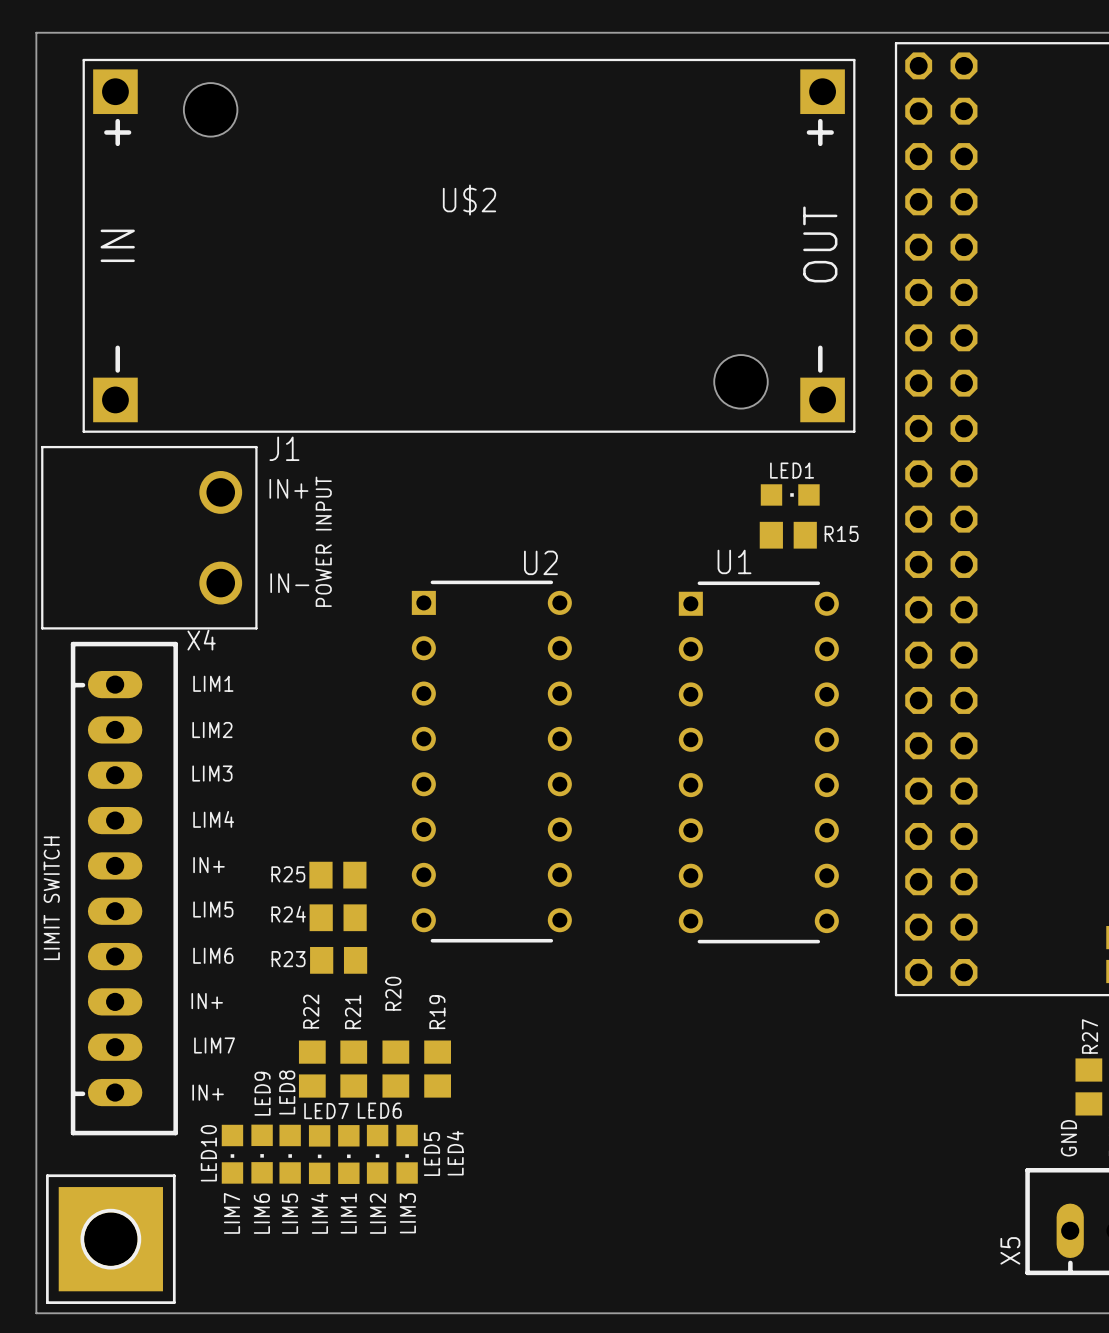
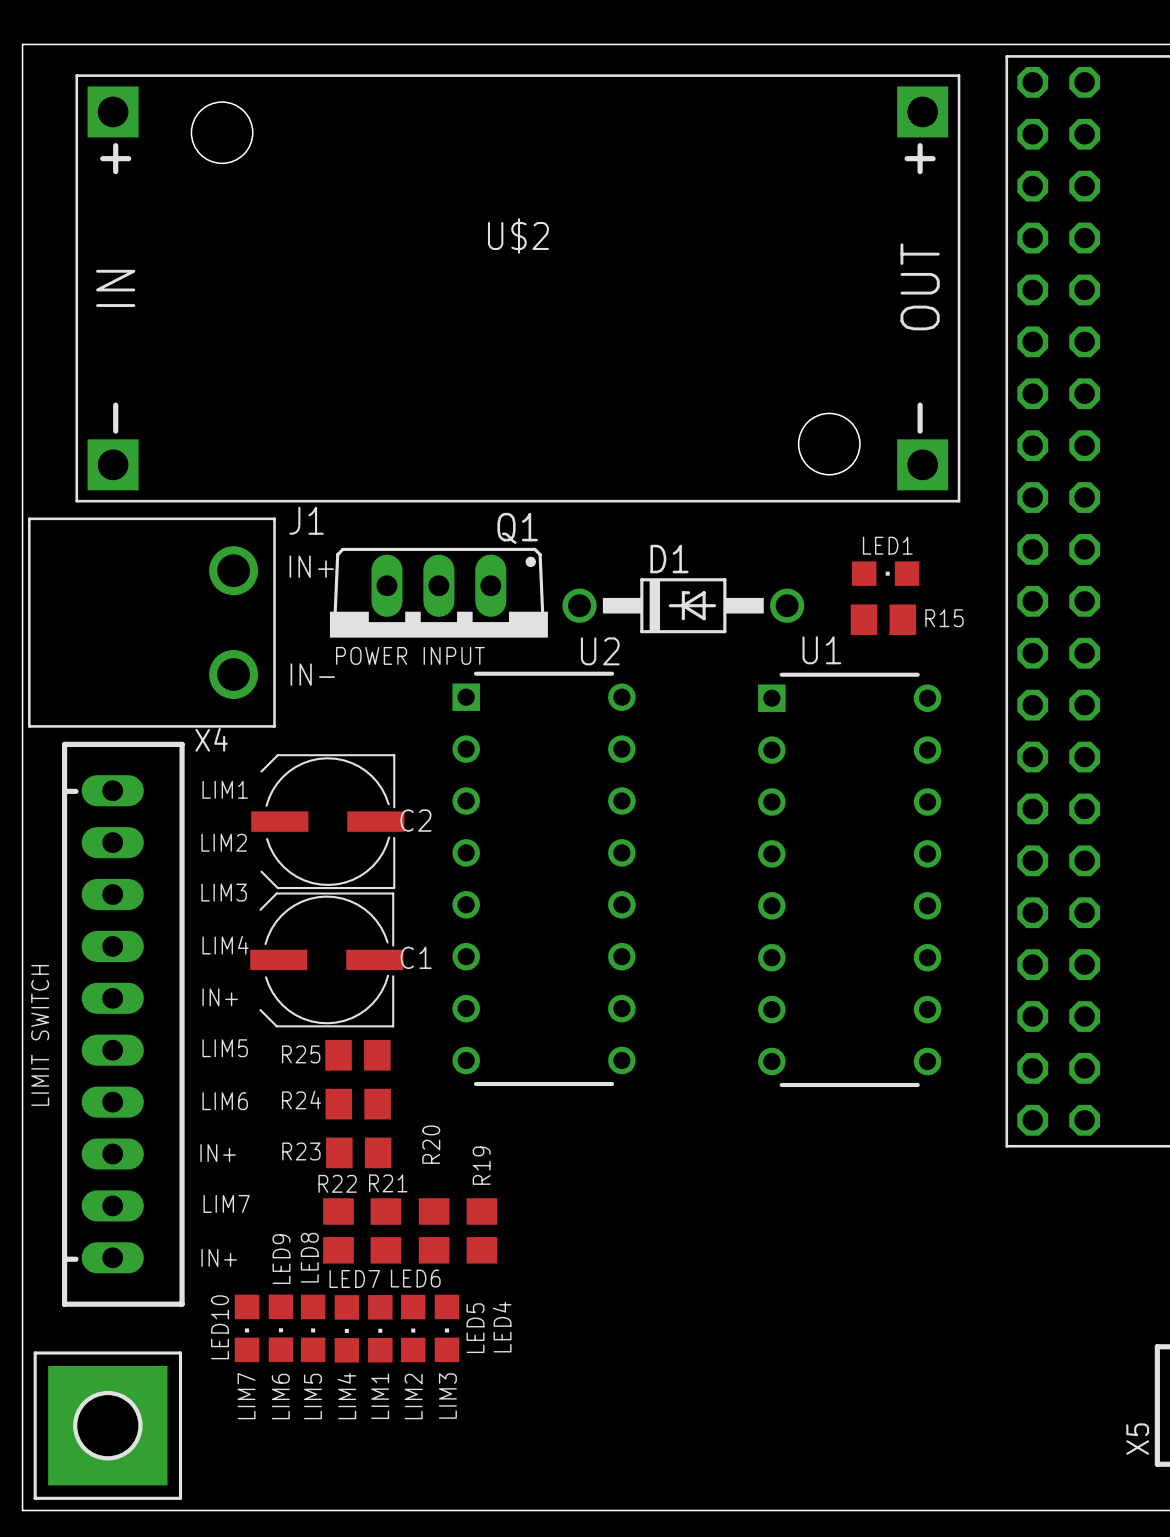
Q1: none -> (438, 592)
D1: none -> (683, 605)
text rotation: 0° (323, 541) -> 90° clockwise (410, 655)
C2: none -> (327, 821)
C1: none -> (326, 959)
R25 position: (337, 875) -> (357, 1055)
R24 position: (338, 917) -> (358, 1104)
R23 position: (338, 960) -> (358, 1152)
R22 name rotation: 0° (311, 1011) -> 90° clockwise (337, 1183)
R21 name rotation: 0° (353, 1012) -> 90° clockwise (388, 1183)

